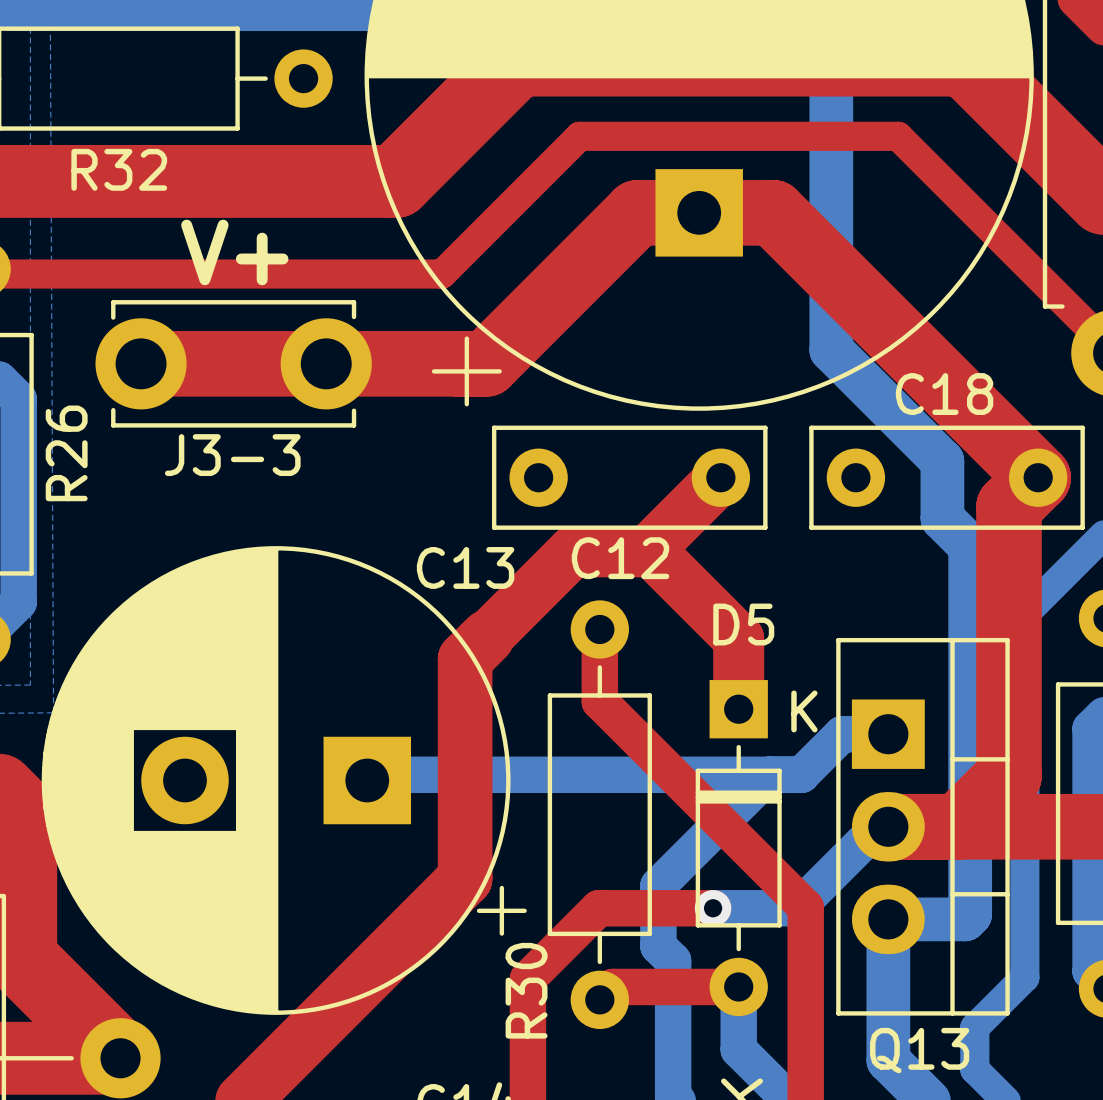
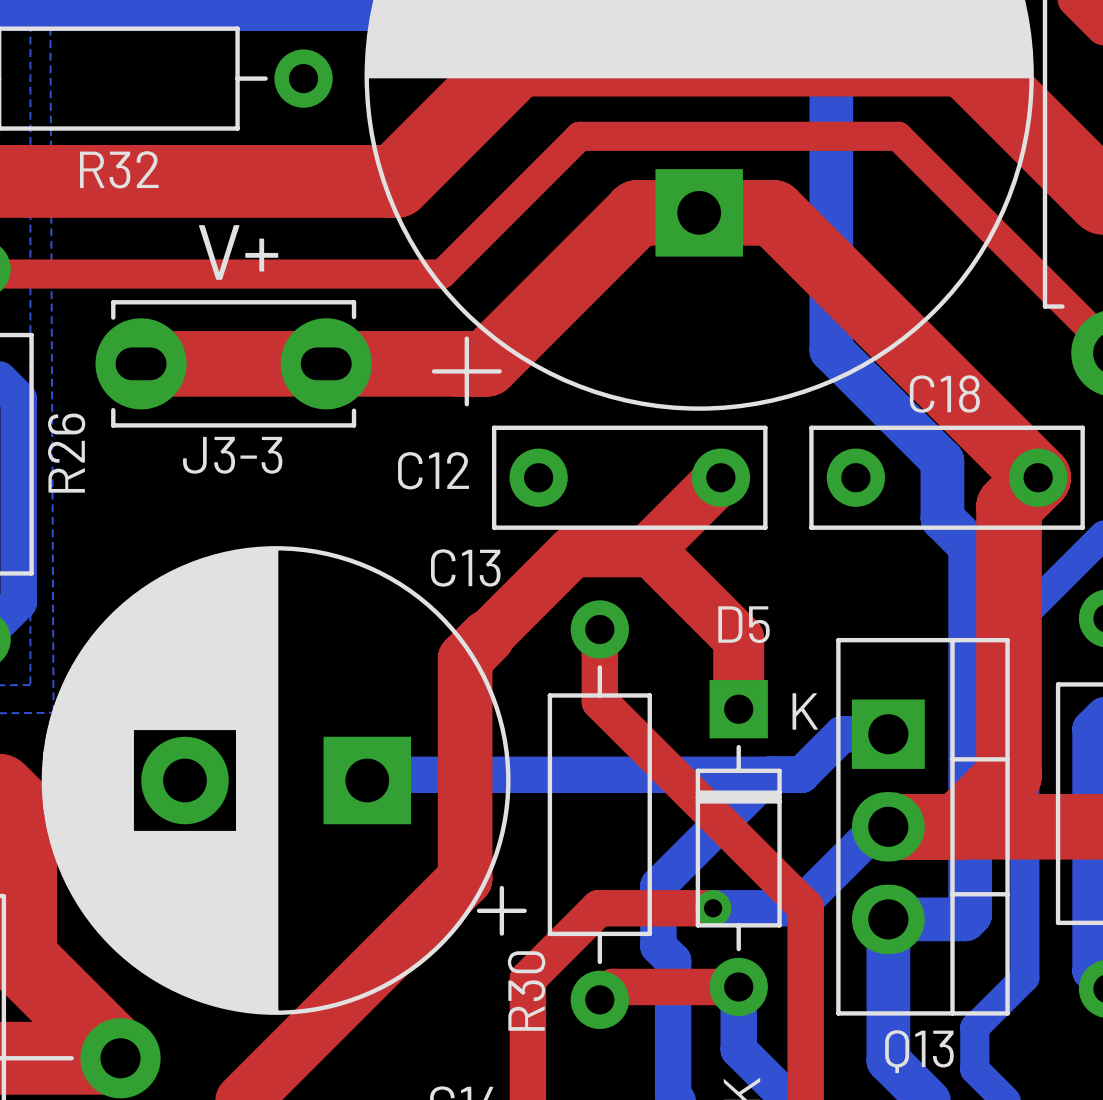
part footprint: [95, 300, 372, 428] -> [95, 300, 372, 428]
C12 name position: C12 (620, 558) -> C12 (433, 470)

